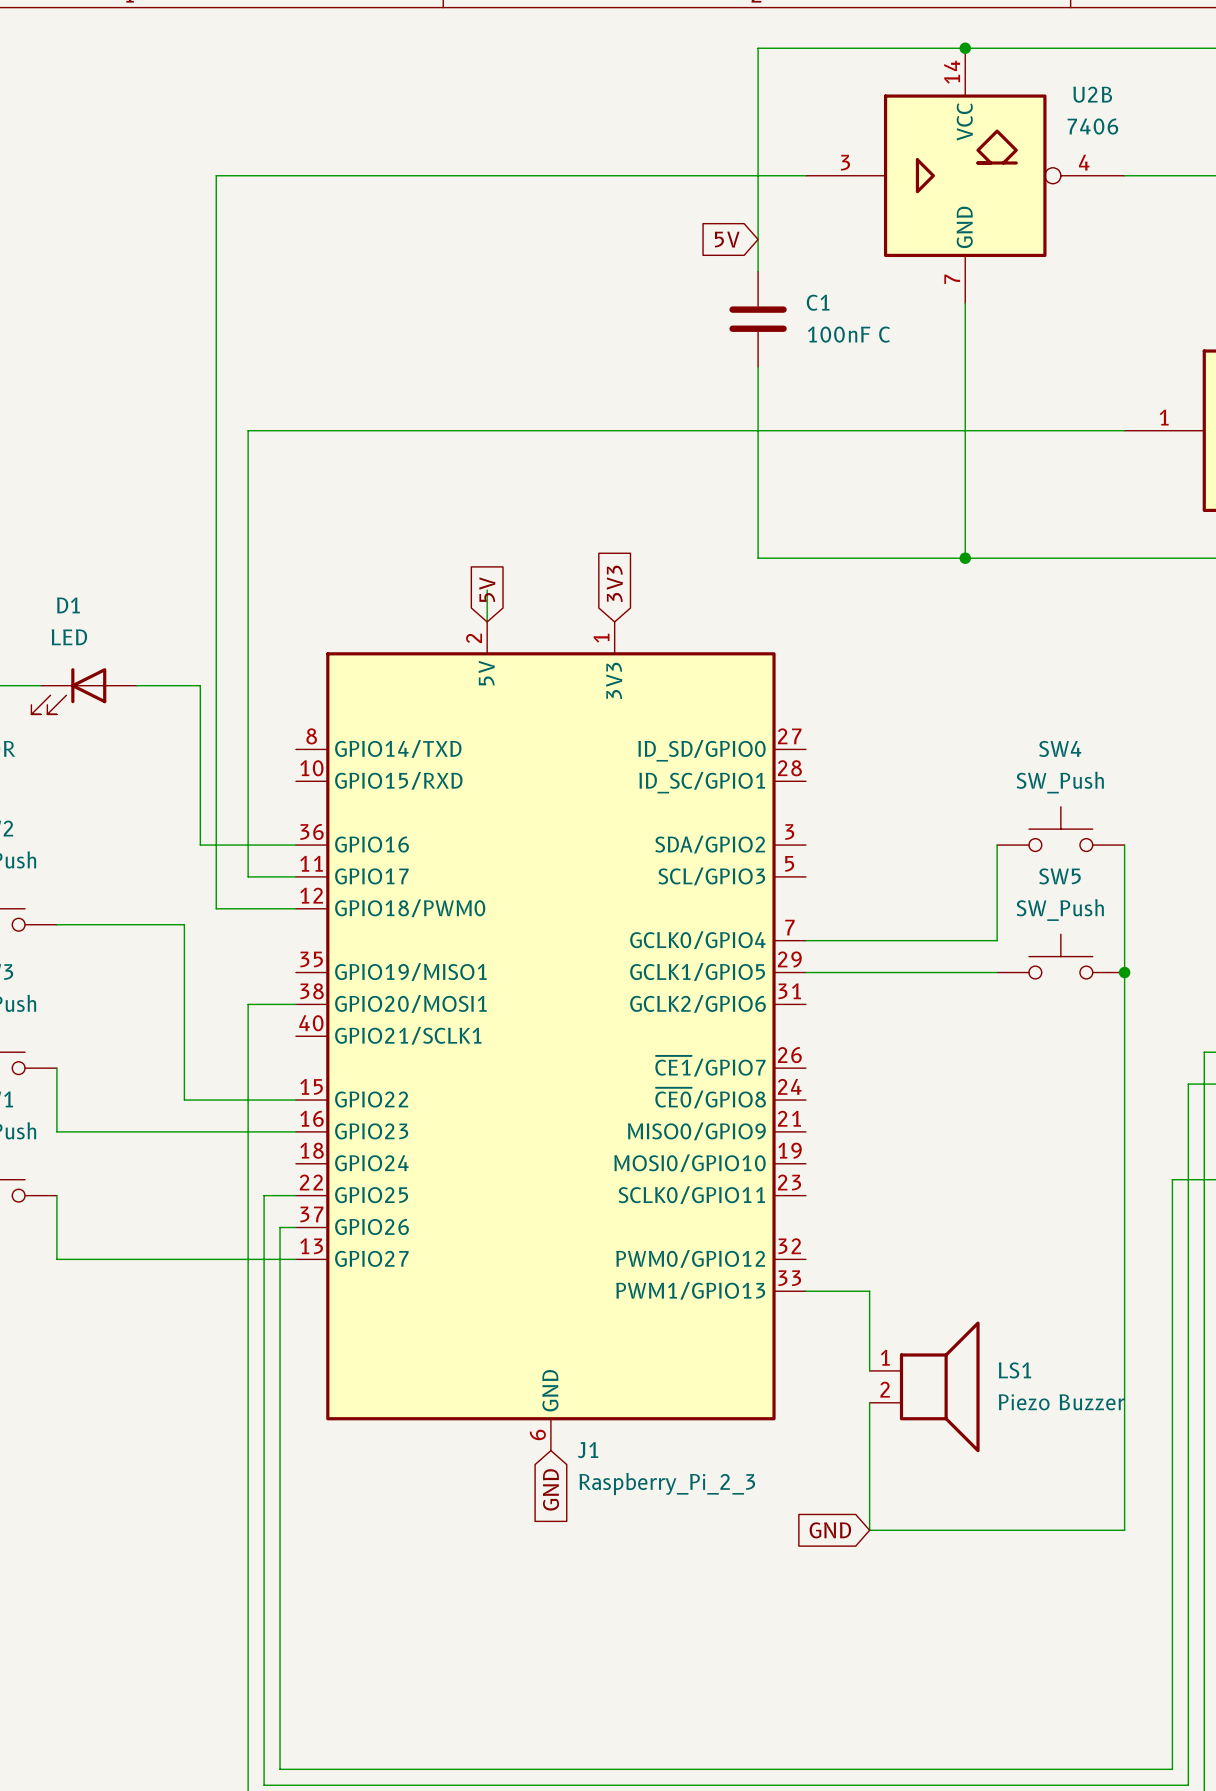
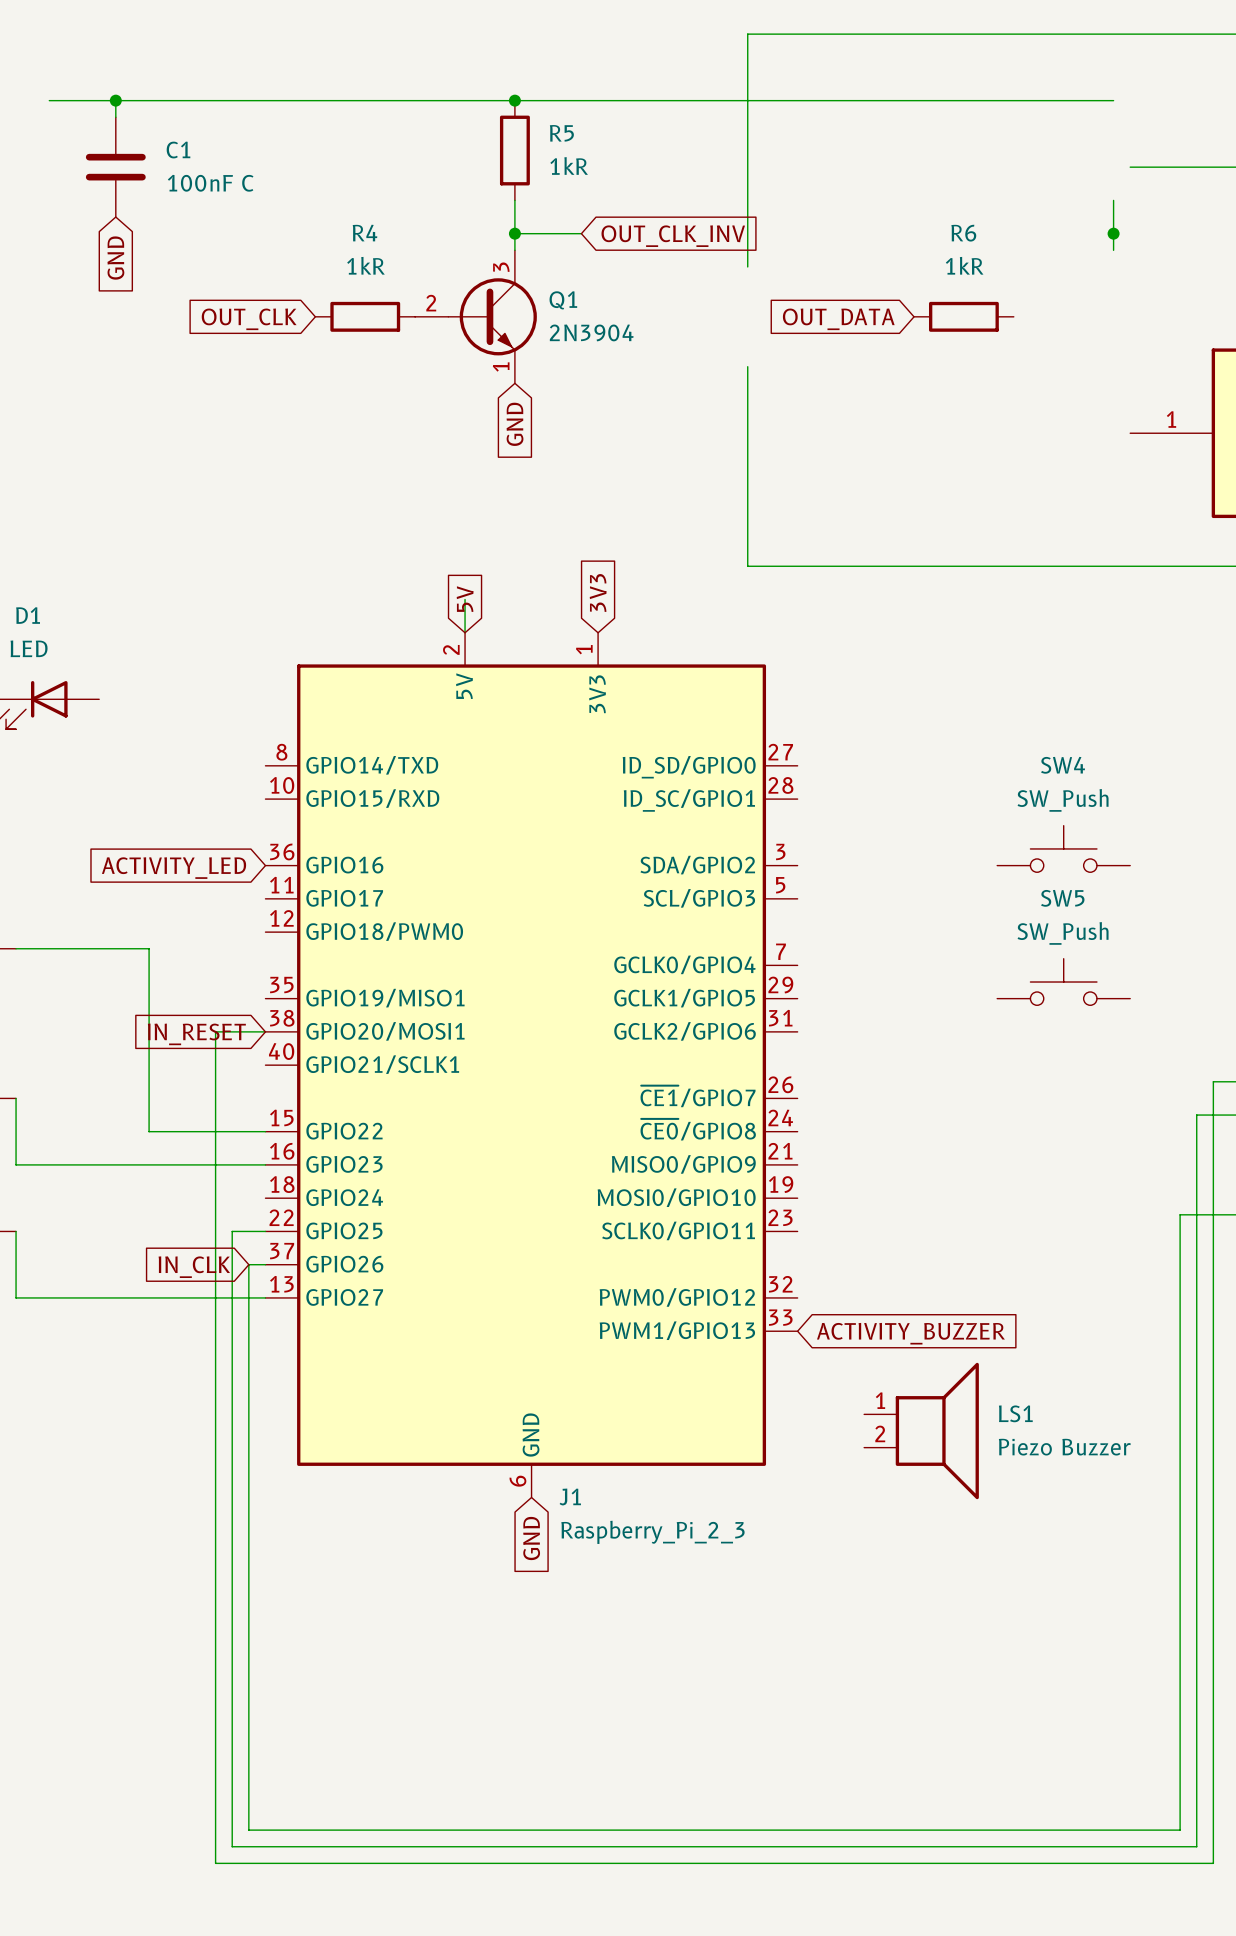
junction: (965, 48) -> none
wire: none -> (49, 100) (1113, 100)
wire: none -> (115, 100) (115, 117)
junction: none -> (115, 100)
junction: none -> (514, 100)
R5: none -> 1kR (514, 150)
wire: (805, 175) (216, 175) (216, 908) (295, 908) -> none
U2B: 7406 (965, 175) -> none
wire: none -> (514, 200) (514, 250)
wire: none -> (1113, 200) (1113, 250)
wire: none -> (514, 233) (581, 233)
junction: none -> (514, 233)
global label: 5V (727, 239) -> none
junction: none -> (1113, 233)
global label: none -> OUT_CLK_INV (673, 236)
global label: none -> GND (115, 258)
wire: (965, 303) (965, 558) -> none
R4: none -> 1kR (365, 316)
Q1: none -> 2N3904 (476, 316)
C1 position: (758, 319) -> (115, 167)
R6: none -> 1kR (963, 316)
global label: none -> OUT_CLK (249, 319)
global label: none -> OUT_DATA (838, 319)
global label: none -> GND (515, 424)
wire: (1124, 430) (248, 430) (248, 876) (295, 876) -> none
junction: (965, 558) -> none
wire: (136, 685) (200, 685) (200, 845) (295, 845) -> none
wire: (997, 845) (997, 940) (805, 940) -> none
wire: (1124, 845) (1124, 1530) (869, 1530) (869, 1402) -> none
global label: none -> ACTIVITY_LED (174, 868)
wire: (805, 972) (997, 972) -> none
junction: (1124, 972) -> none
global label: none -> IN_RESET (196, 1034)
global label: none -> IN_CLK (194, 1267)
wire: (805, 1291) (869, 1291) (869, 1370) -> none
global label: none -> ACTIVITY_BUZZER (910, 1333)
global label: GND (830, 1530) -> none

